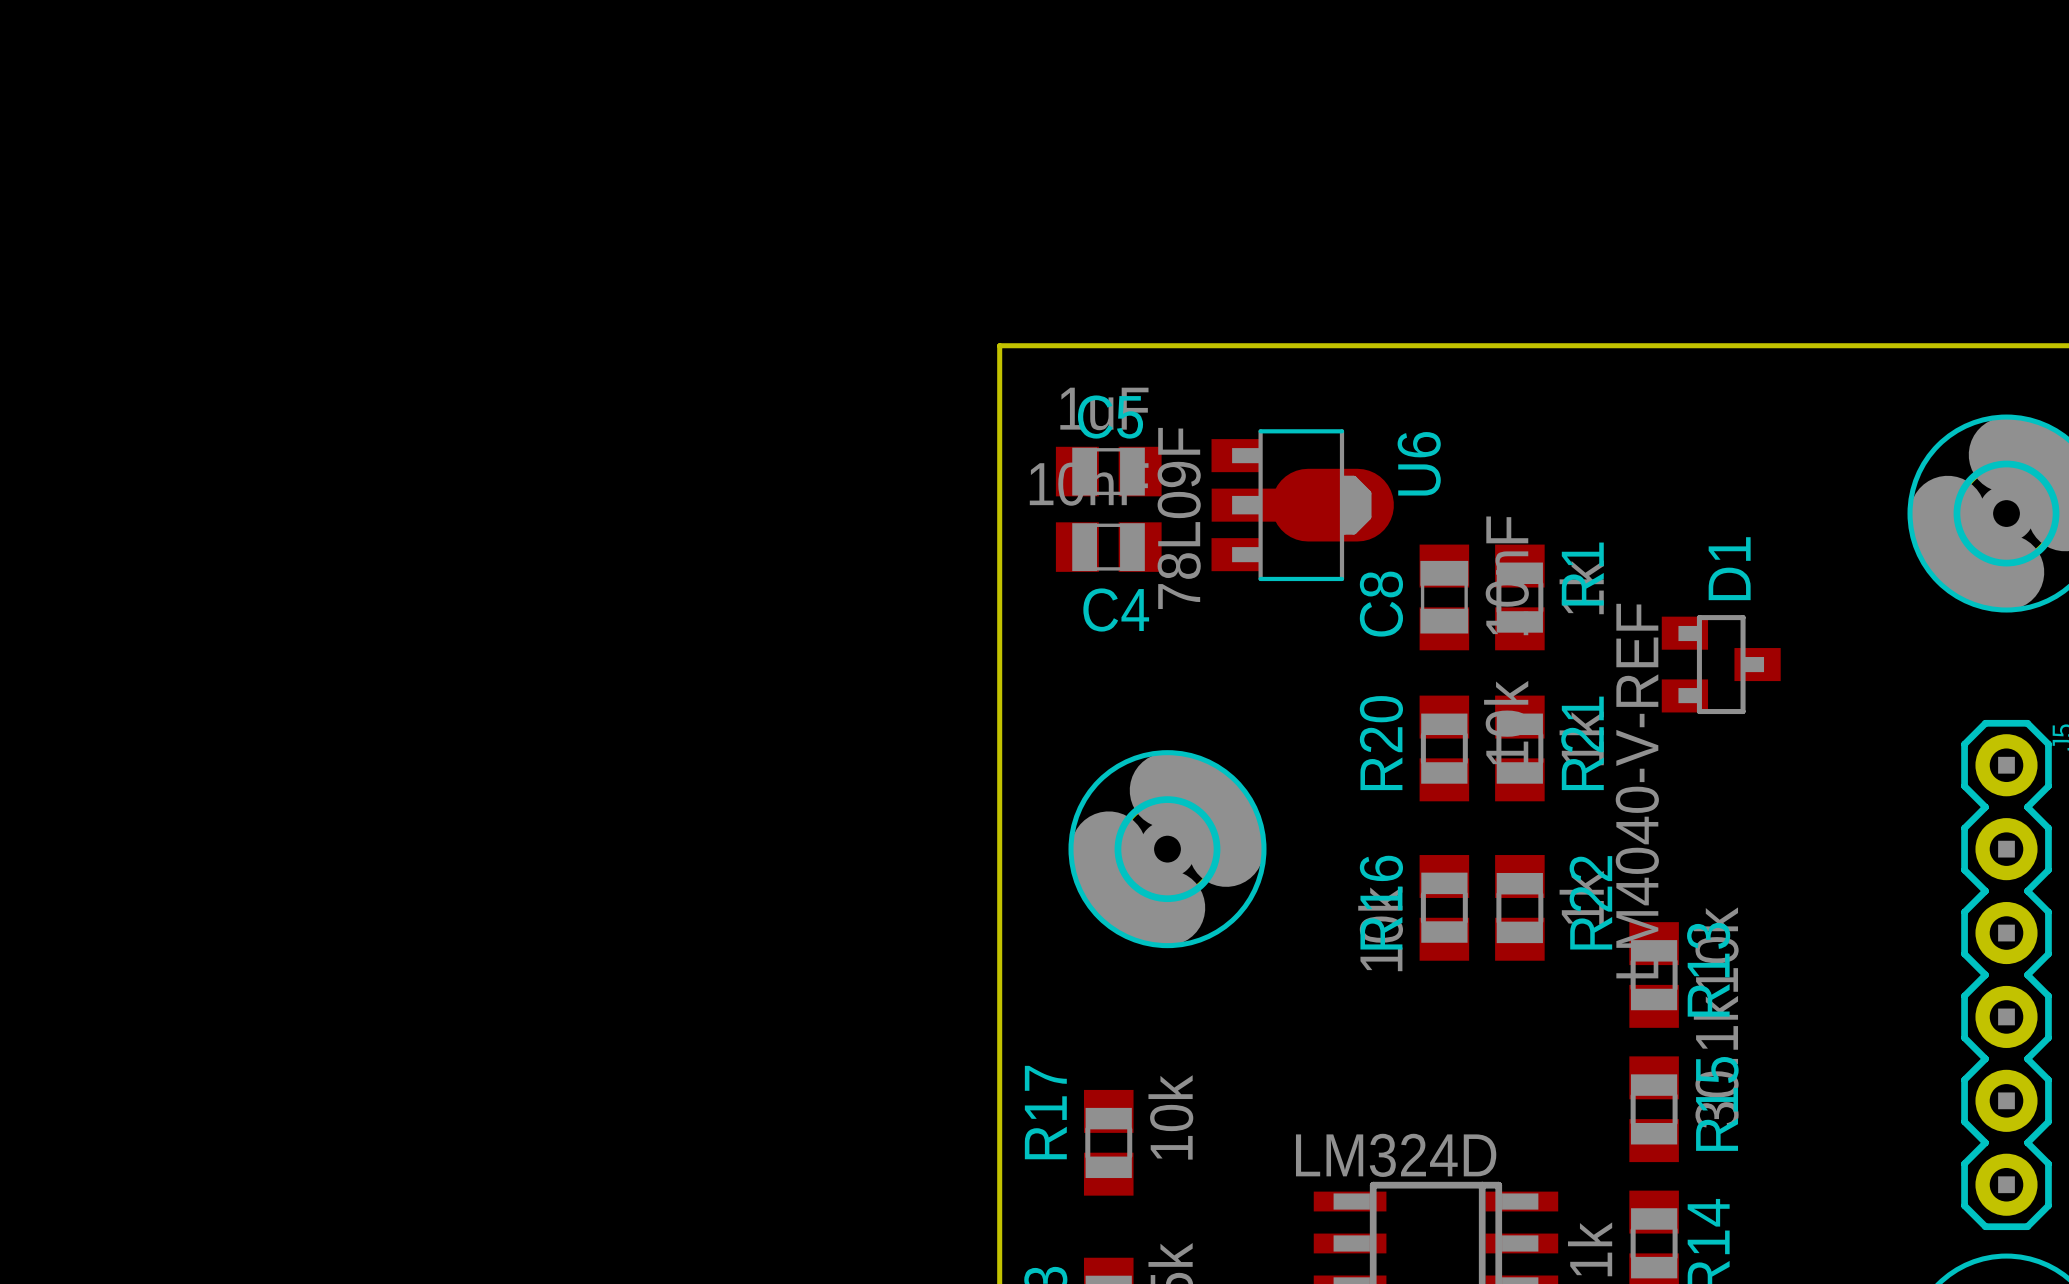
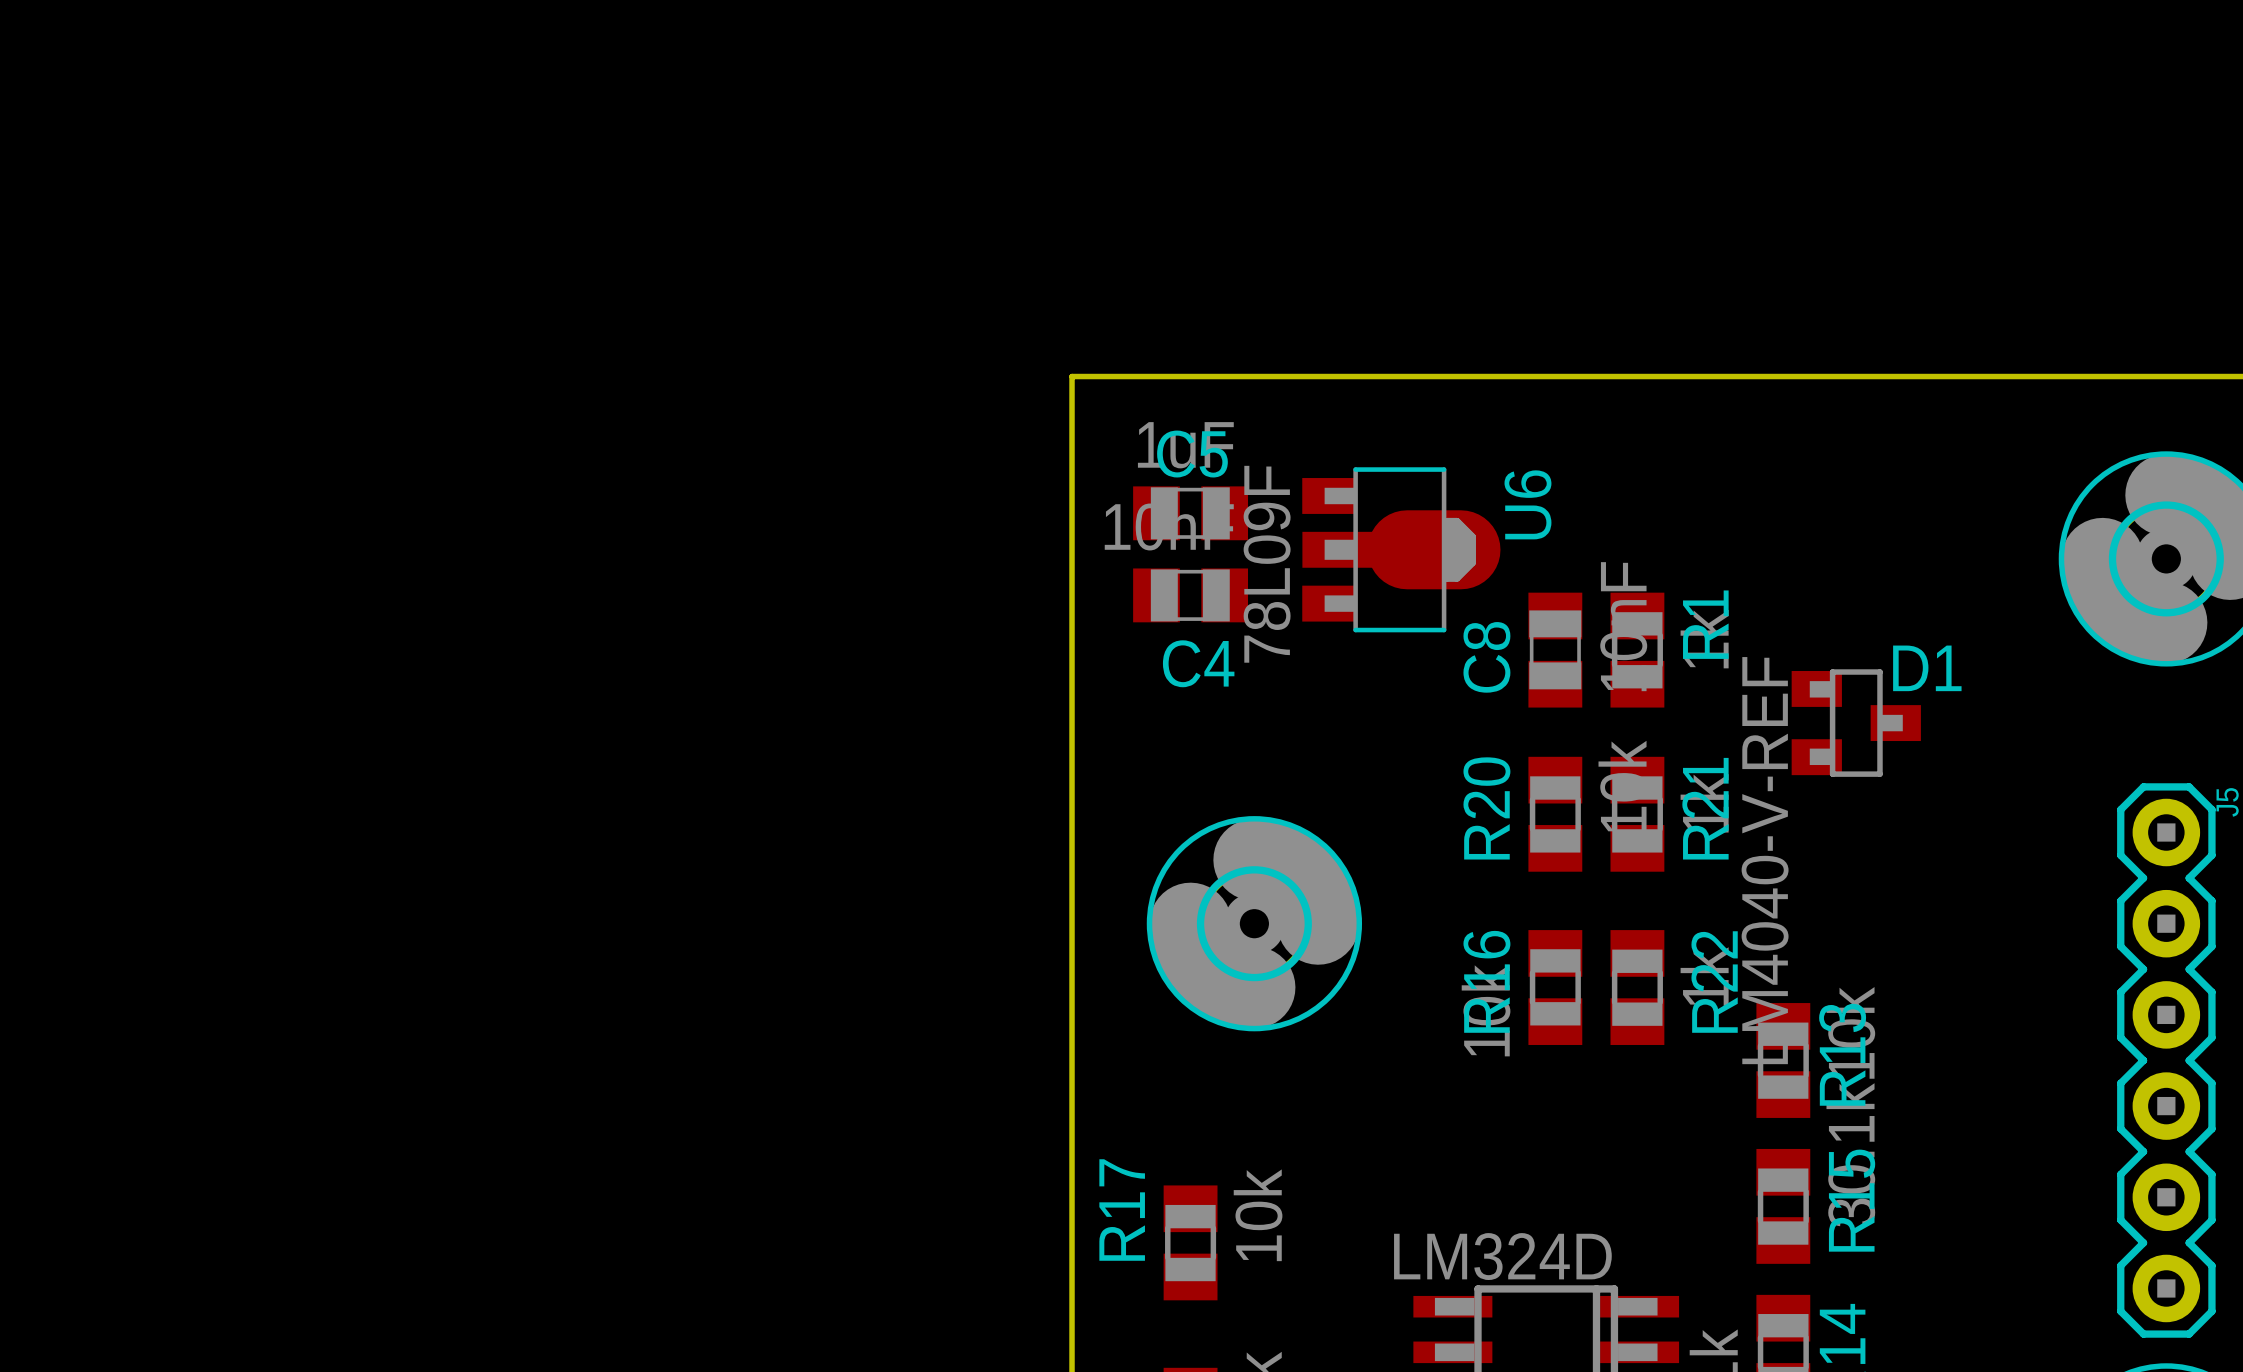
D1 name rotation: 0° (1729, 568) -> 90° clockwise (1927, 668)

